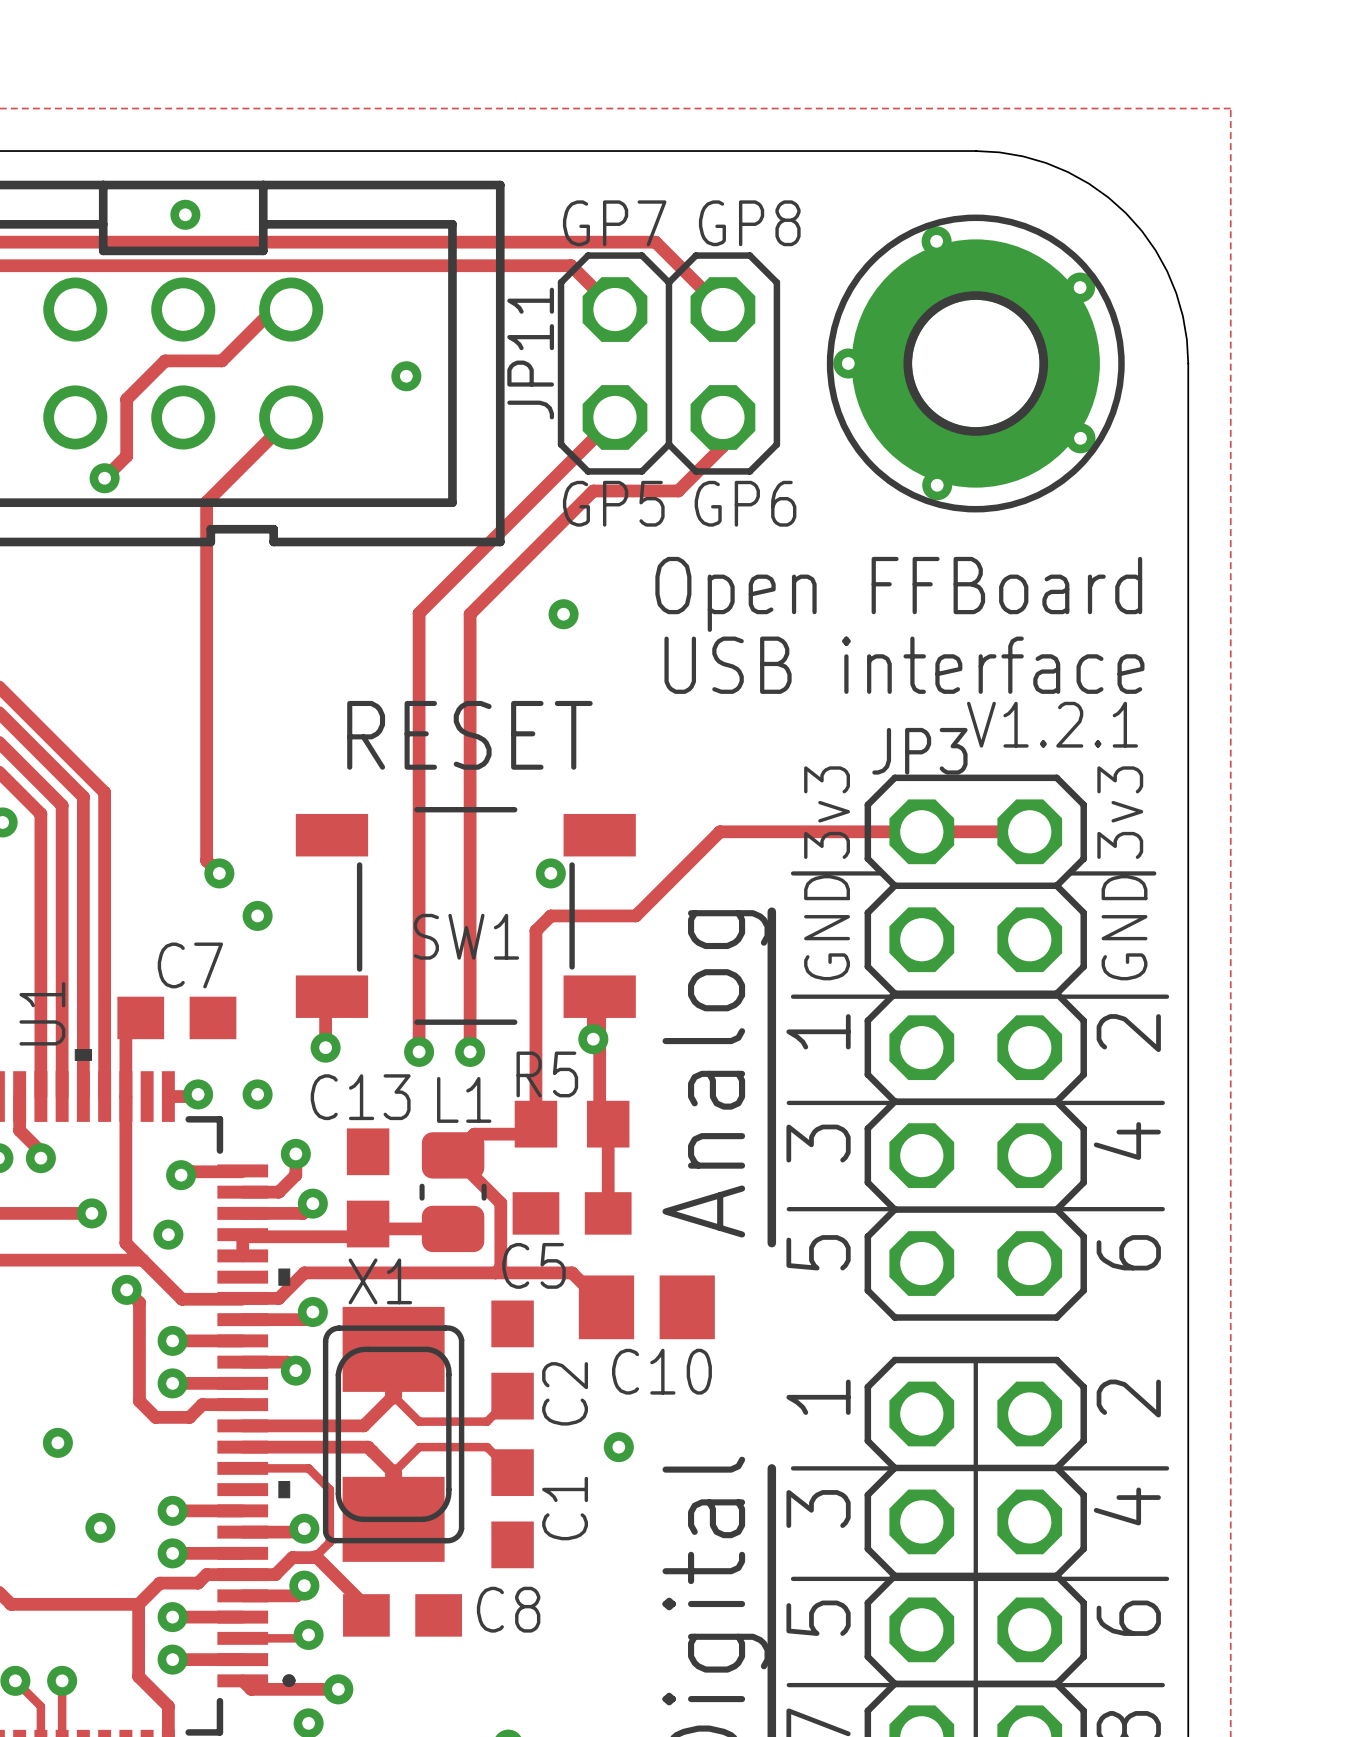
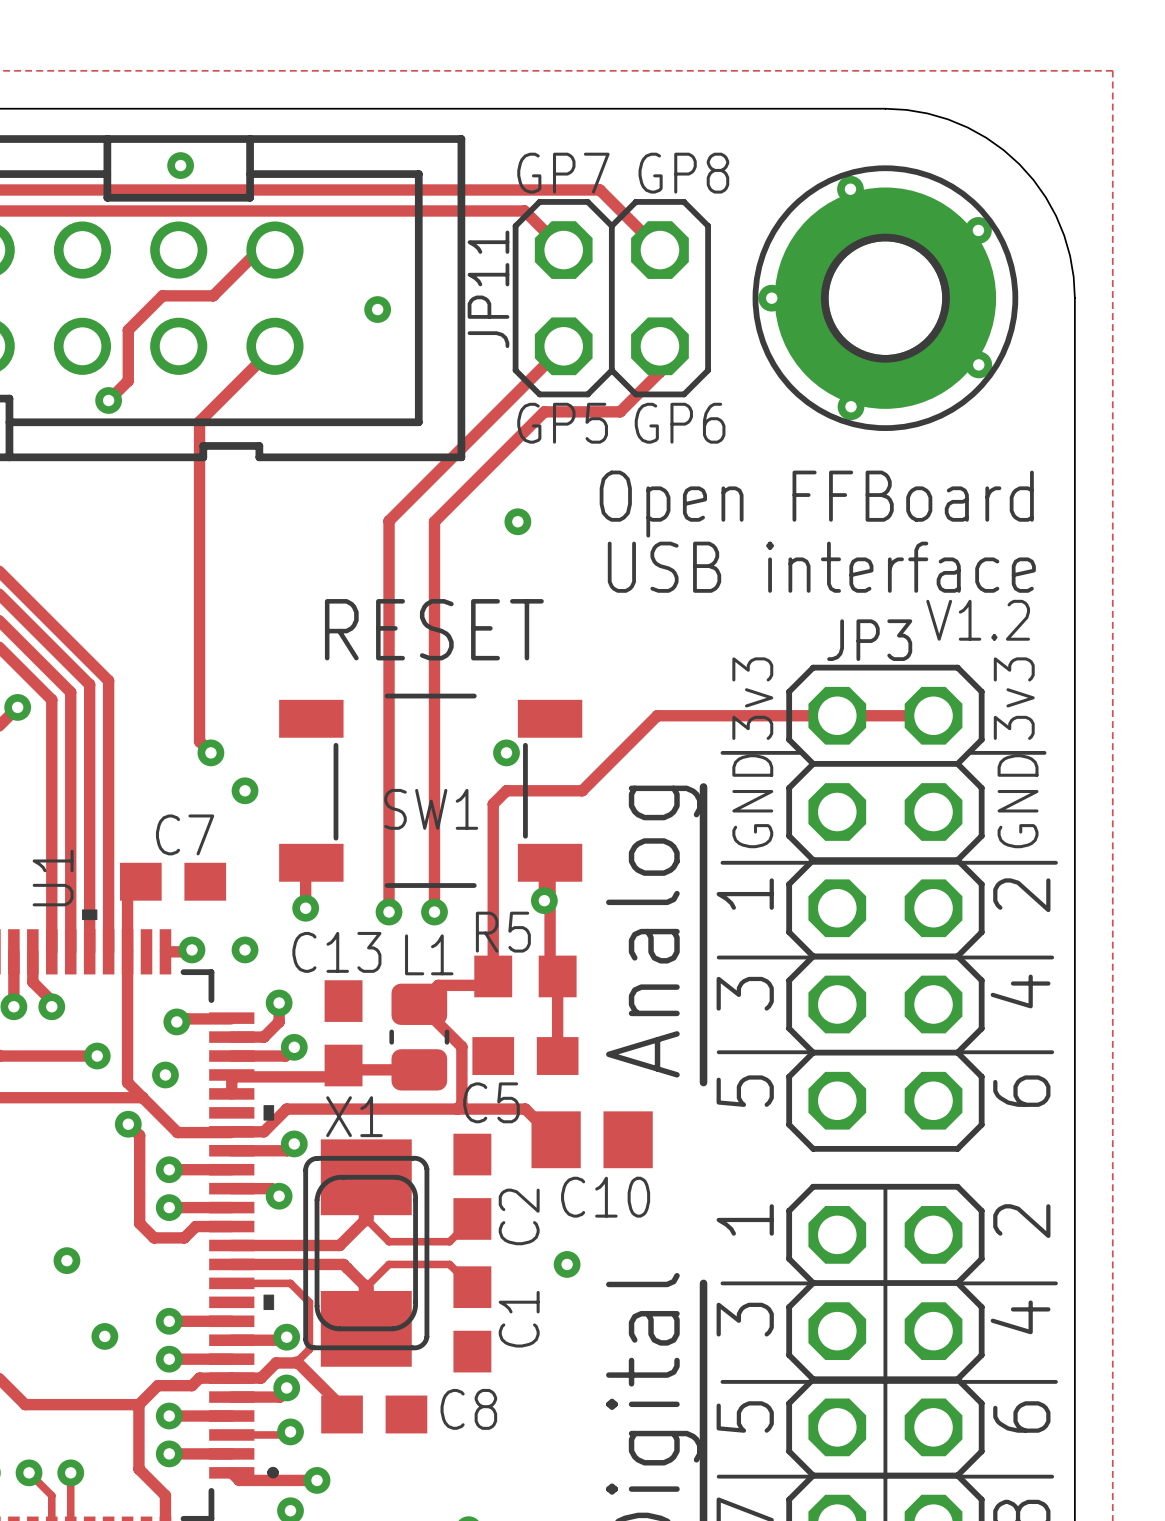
text: V1.2.1 (1052, 724) -> V1.2 (978, 620)
JP3 name position: JP3 (919, 751) -> JP3 (869, 640)

